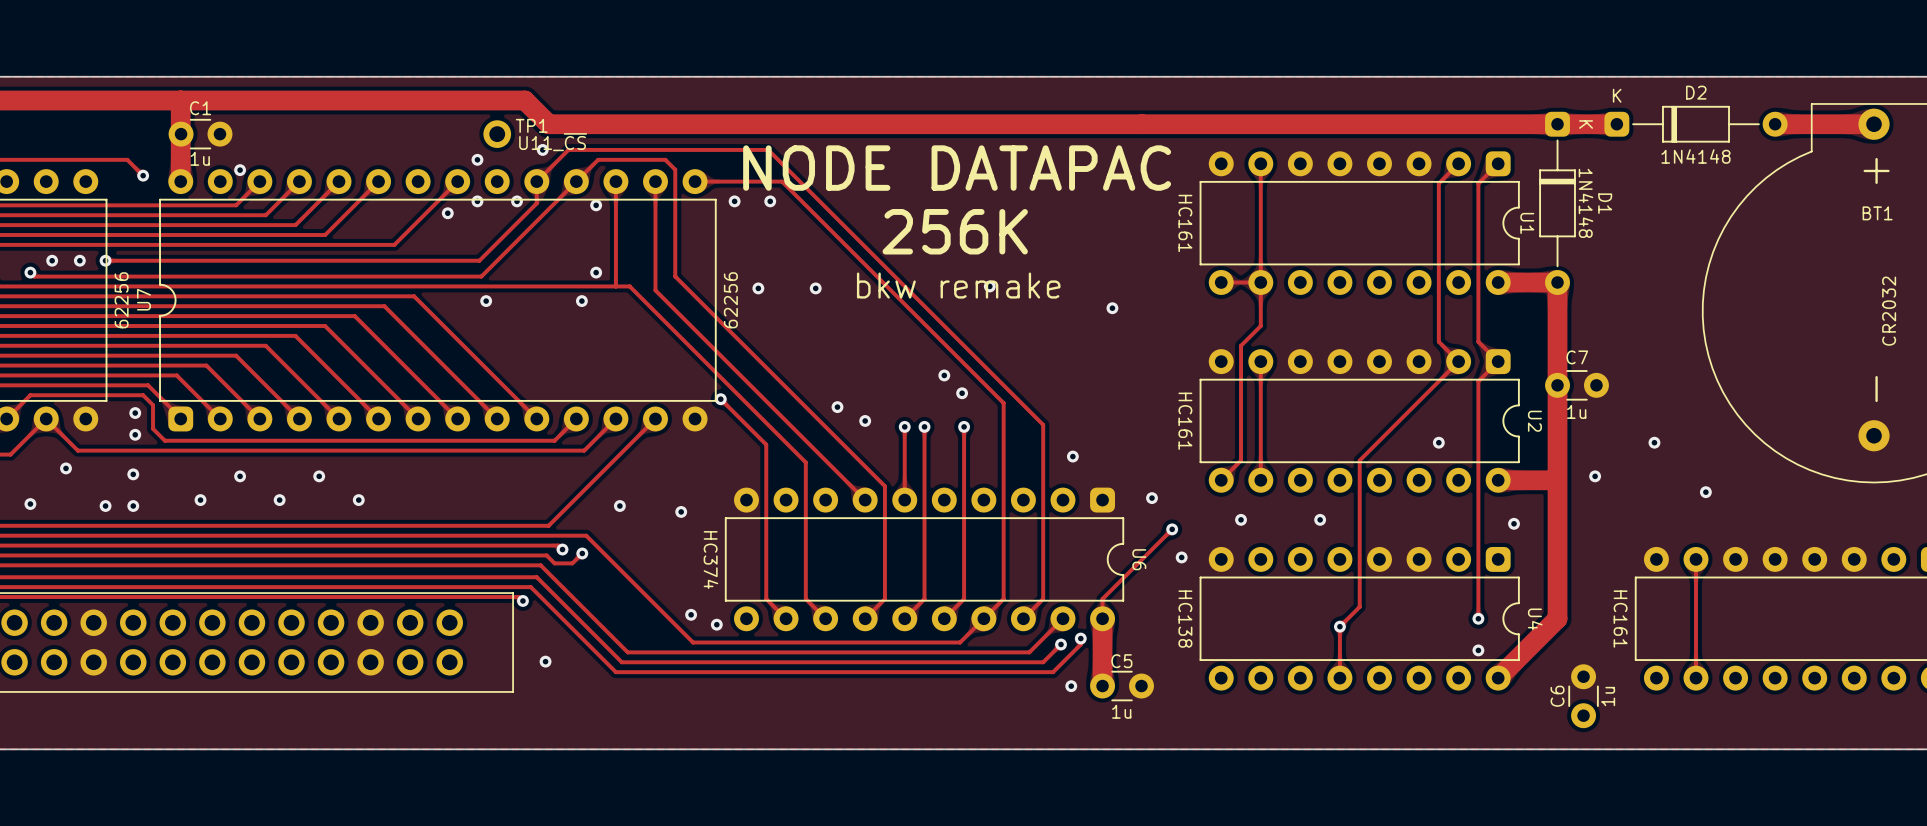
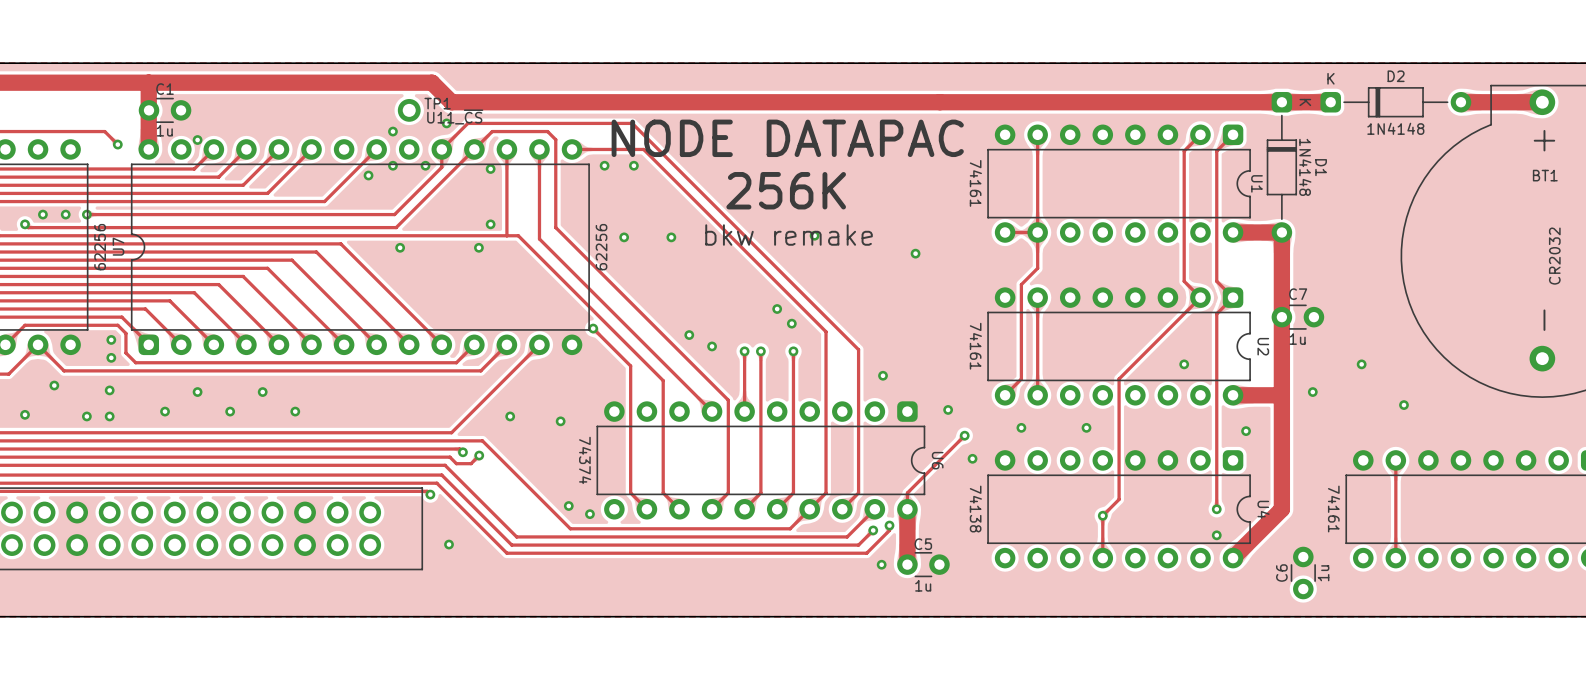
U1 value: HC161 (1185, 223) -> 74161 (975, 183)
U2 value: HC161 (1185, 421) -> 74161 (975, 346)
U6 value: HC374 (710, 560) -> 74374 (585, 460)
U4 value: HC138 (1185, 619) -> 74138 (975, 509)
part value: HC161 (1620, 619) -> 74161 (1334, 509)

